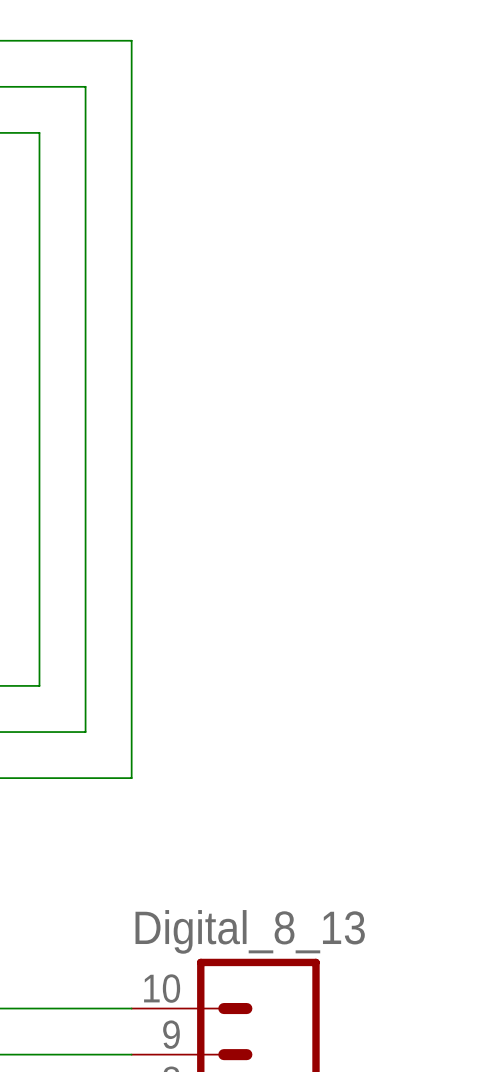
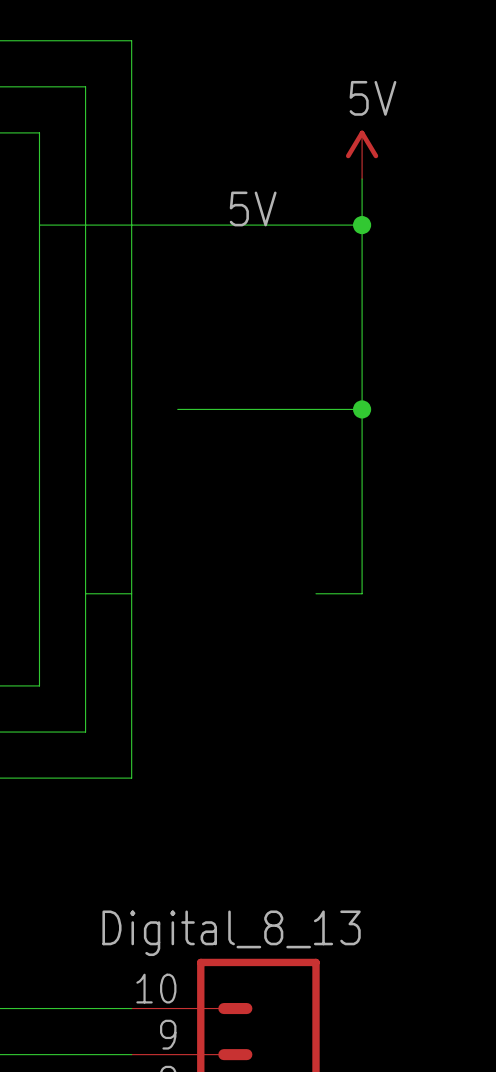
power symbol: none -> 5V (362, 154)
wire: none -> (362, 179) (362, 593) (315, 593)
label: none -> 5V (253, 208)
wire: none -> (39, 225) (362, 225)
junction: none -> (362, 225)
wire: none -> (177, 409) (362, 409)
junction: none -> (362, 409)
wire: none -> (85, 593) (131, 593)

